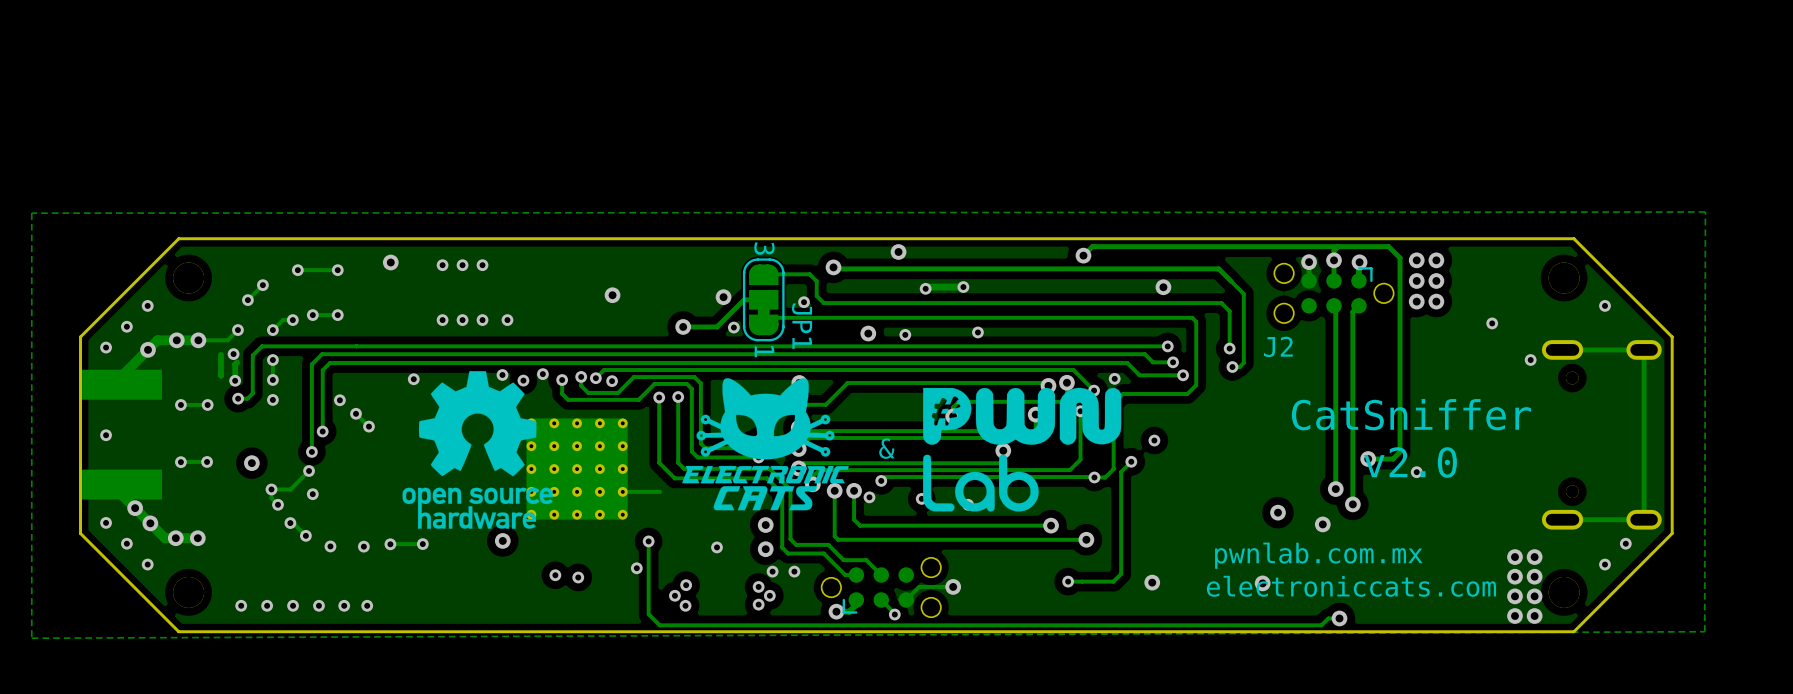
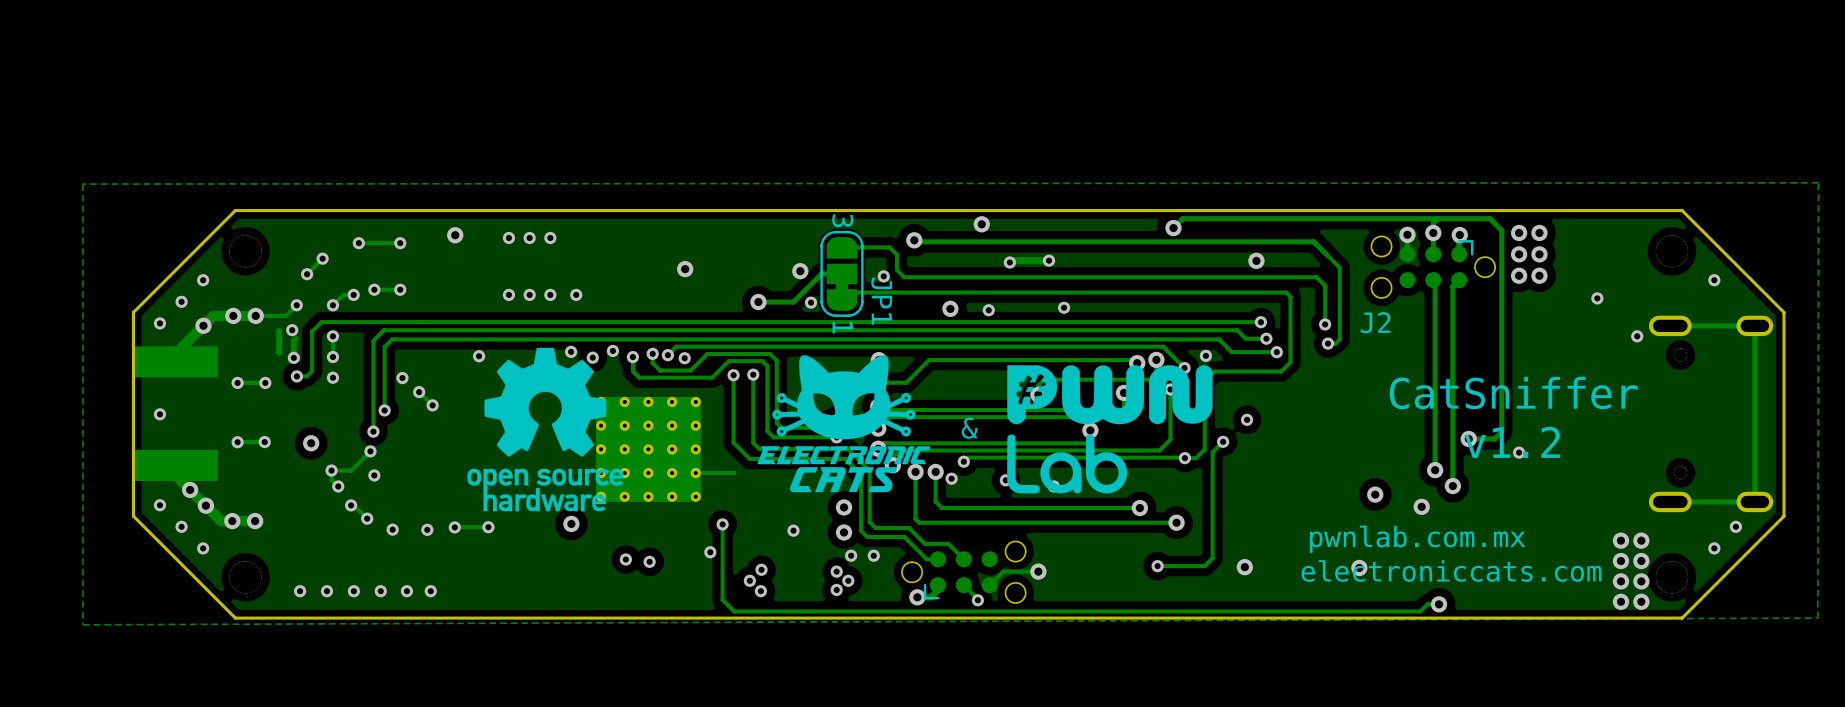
text: v2.0 (1410, 462) -> v1.2 (1512, 442)

